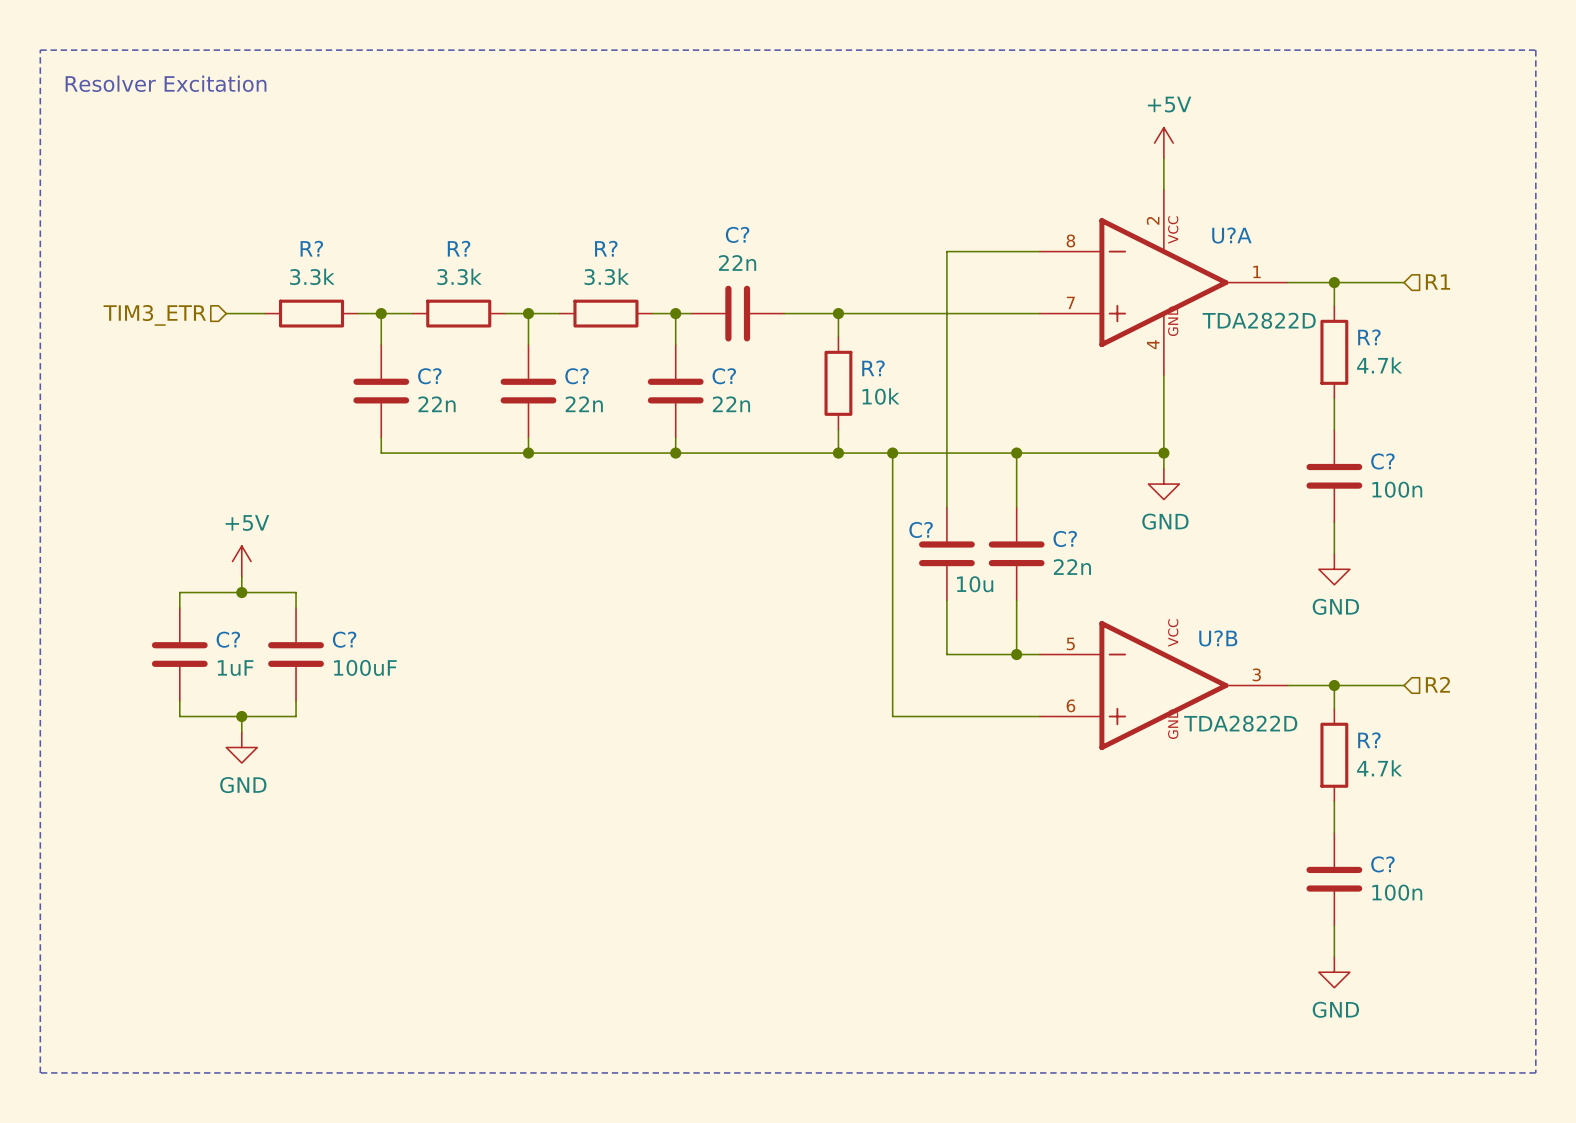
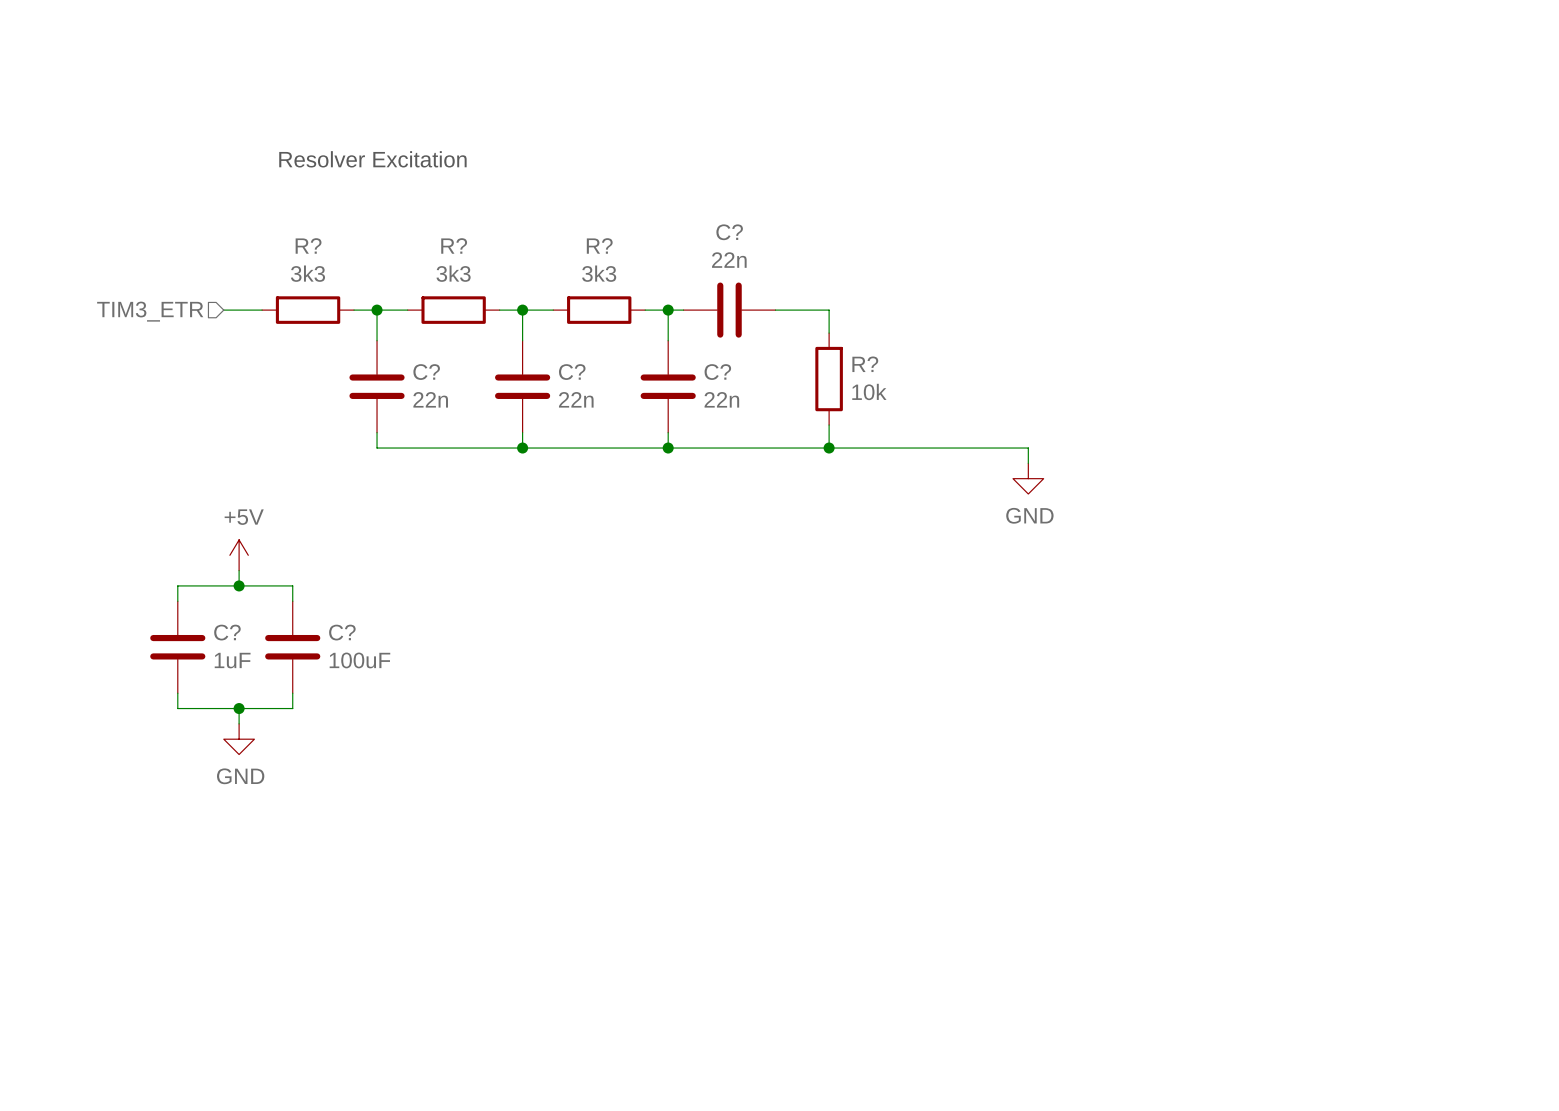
line: (40, 50) (1535, 50) (1535, 1072) (40, 1072) (40, 50) -> none
text position: Resolver Excitation (166, 83) -> Resolver Excitation (372, 159)
power symbol: +5V (1163, 143) -> none
wire: (1163, 158) (1163, 189) -> none
wire: (1039, 251) (946, 251) (946, 507) -> none
R? value: 3.3k (312, 276) -> 3k3 (307, 273)
R? value: 3.3k (459, 276) -> 3k3 (453, 273)
R? value: 3.3k (606, 276) -> 3k3 (599, 273)
U?A: TDA2822D (1163, 282) -> none
wire: (1287, 282) (1404, 282) -> none
wire: (1334, 282) (1334, 305) -> none
junction: (1334, 282) -> none
hierarchical label: R1 (1437, 282) -> none
wire: (838, 313) (1039, 313) -> none
junction: (838, 313) -> none
R?: 4.7k (1334, 352) -> none
wire: (1163, 375) (1163, 468) -> none
wire: (1334, 398) (1334, 429) -> none
wire: (892, 453) (892, 716) (1039, 716) -> none
junction: (892, 453) -> none
wire: (1016, 453) (1016, 507) -> none
junction: (1016, 453) -> none
wire: (1039, 453) (1163, 453) -> (1028, 448) (1028, 463)
junction: (1163, 453) -> none
C?: 100n (1334, 476) -> none
power symbol position: GND (1163, 484) -> GND (1028, 478)
wire: (1334, 522) (1334, 553) -> none
C?: 10u (946, 553) -> none
C?: 22n (1016, 553) -> none
power symbol: GND (1334, 569) -> none
wire: (946, 600) (946, 654) (1039, 654) -> none
wire: (1016, 600) (1016, 654) -> none
junction: (1016, 654) -> none
hierarchical label: R2 (1437, 684) -> none
U?B: TDA2822D (1163, 685) -> none
wire: (1287, 685) (1404, 685) -> none
wire: (1334, 685) (1334, 708) -> none
junction: (1334, 685) -> none
R?: 4.7k (1334, 755) -> none
wire: (1334, 801) (1334, 832) -> none
C?: 100n (1334, 879) -> none
wire: (1334, 925) (1334, 956) -> none
power symbol: GND (1334, 972) -> none

